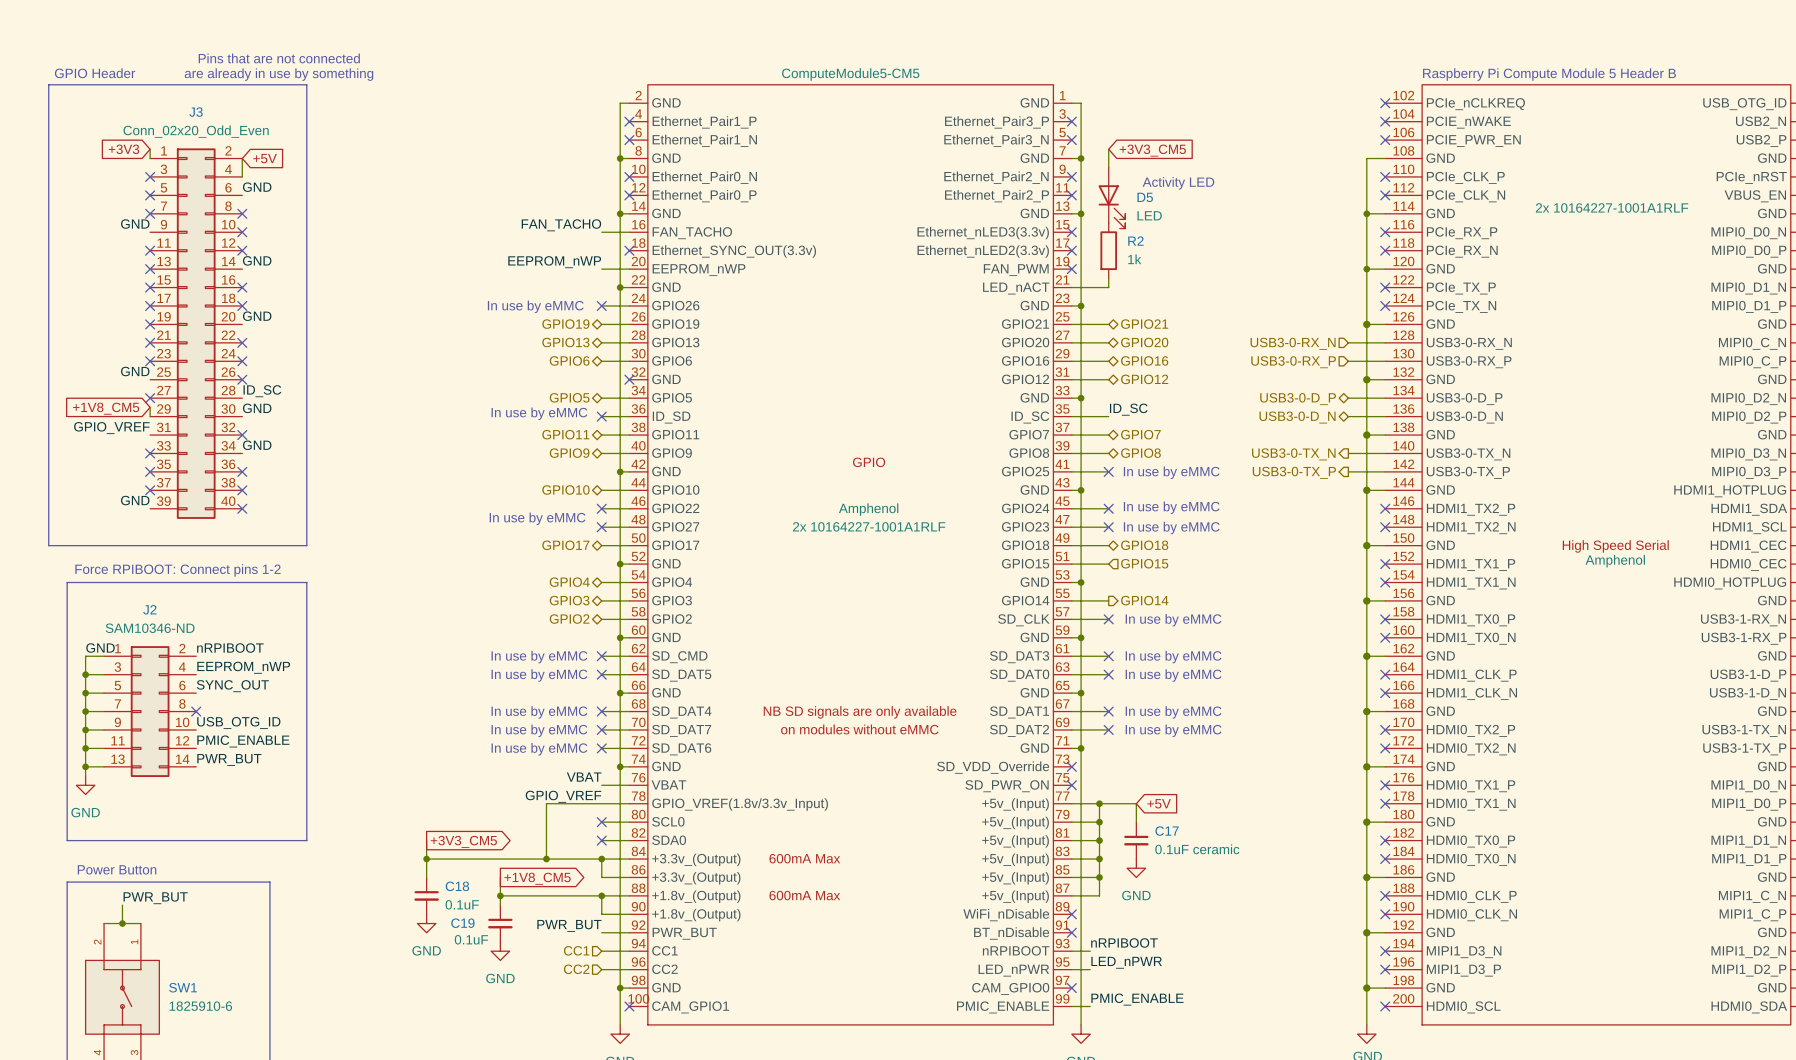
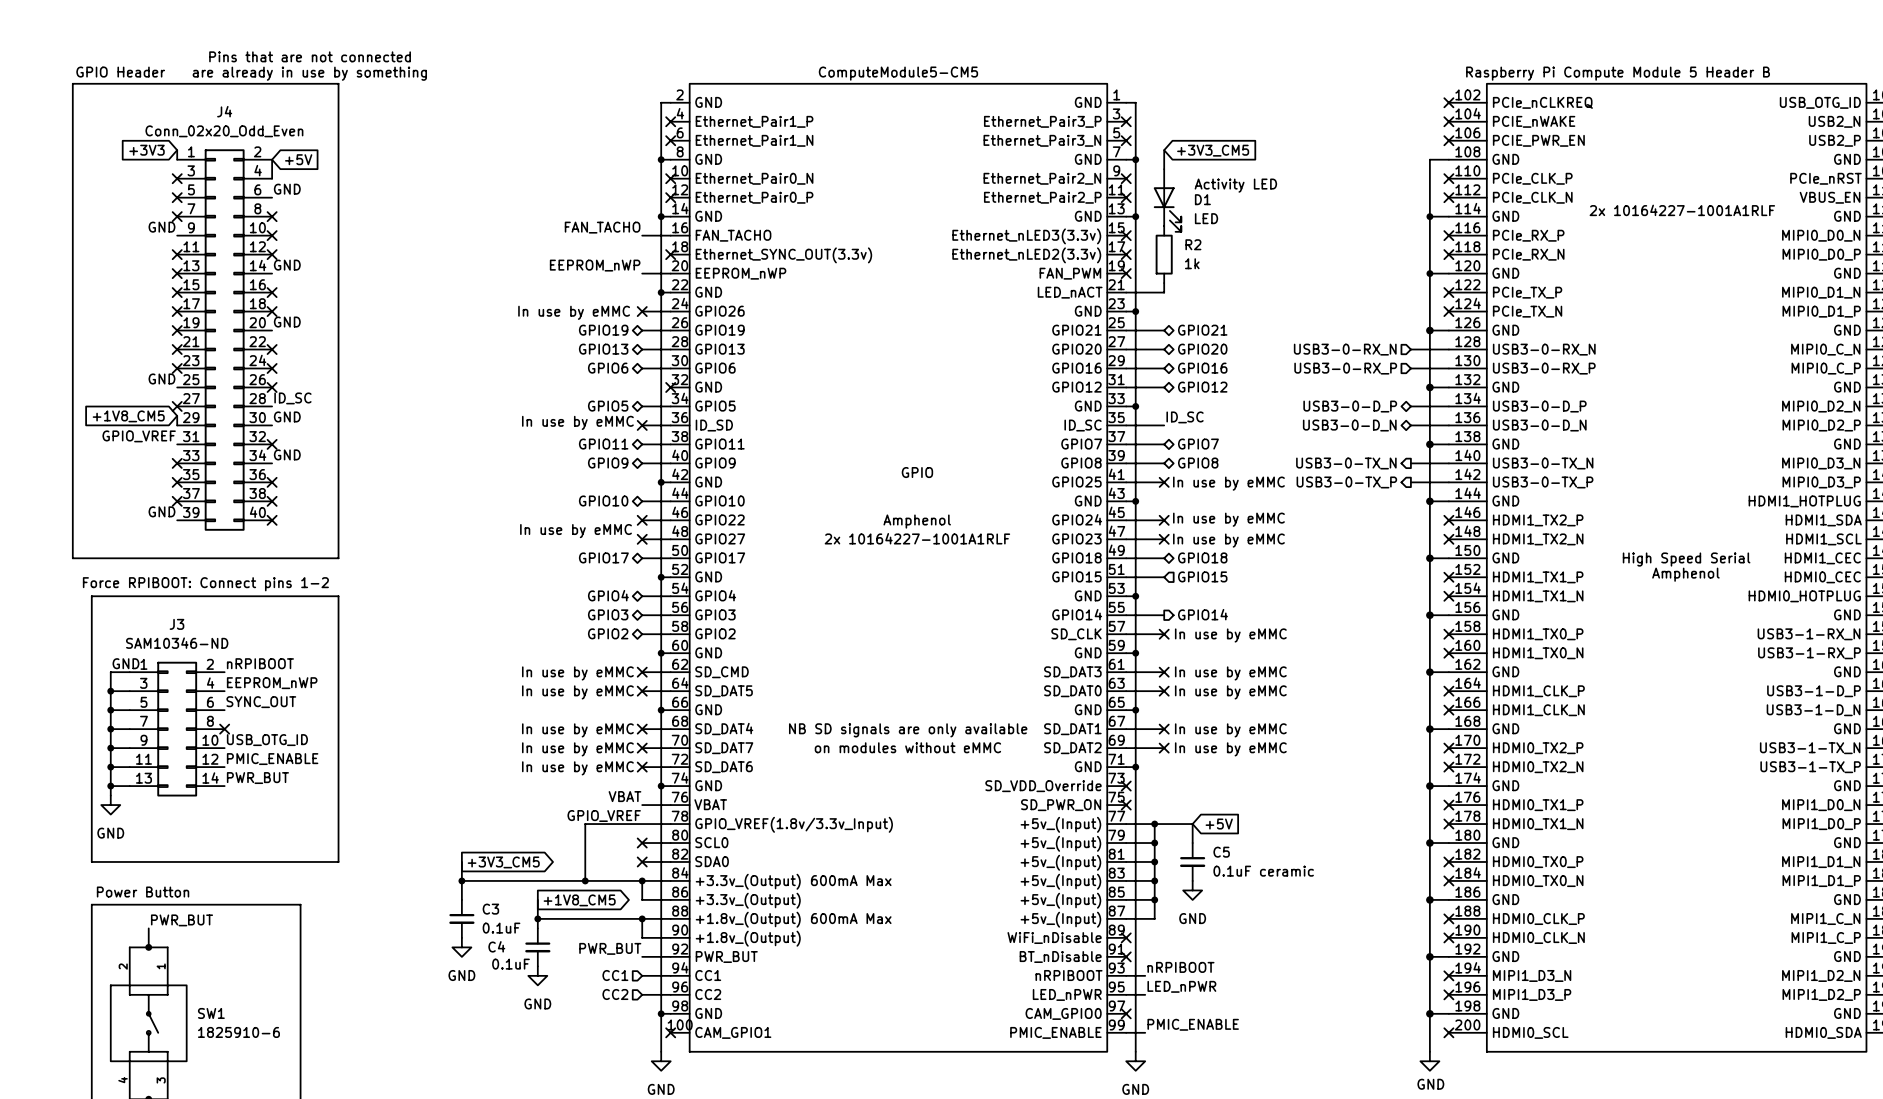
J3 name: J3 (196, 112) -> J4 (224, 111)
D5 name: D5 (1145, 197) -> D1 (1202, 199)
J2 name: J2 (149, 609) -> J3 (176, 624)
C17 name: C17 (1167, 831) -> C5 (1221, 852)
C18 name: C18 (457, 886) -> C3 (490, 909)
C19 name: C19 (462, 923) -> C4 (496, 946)

